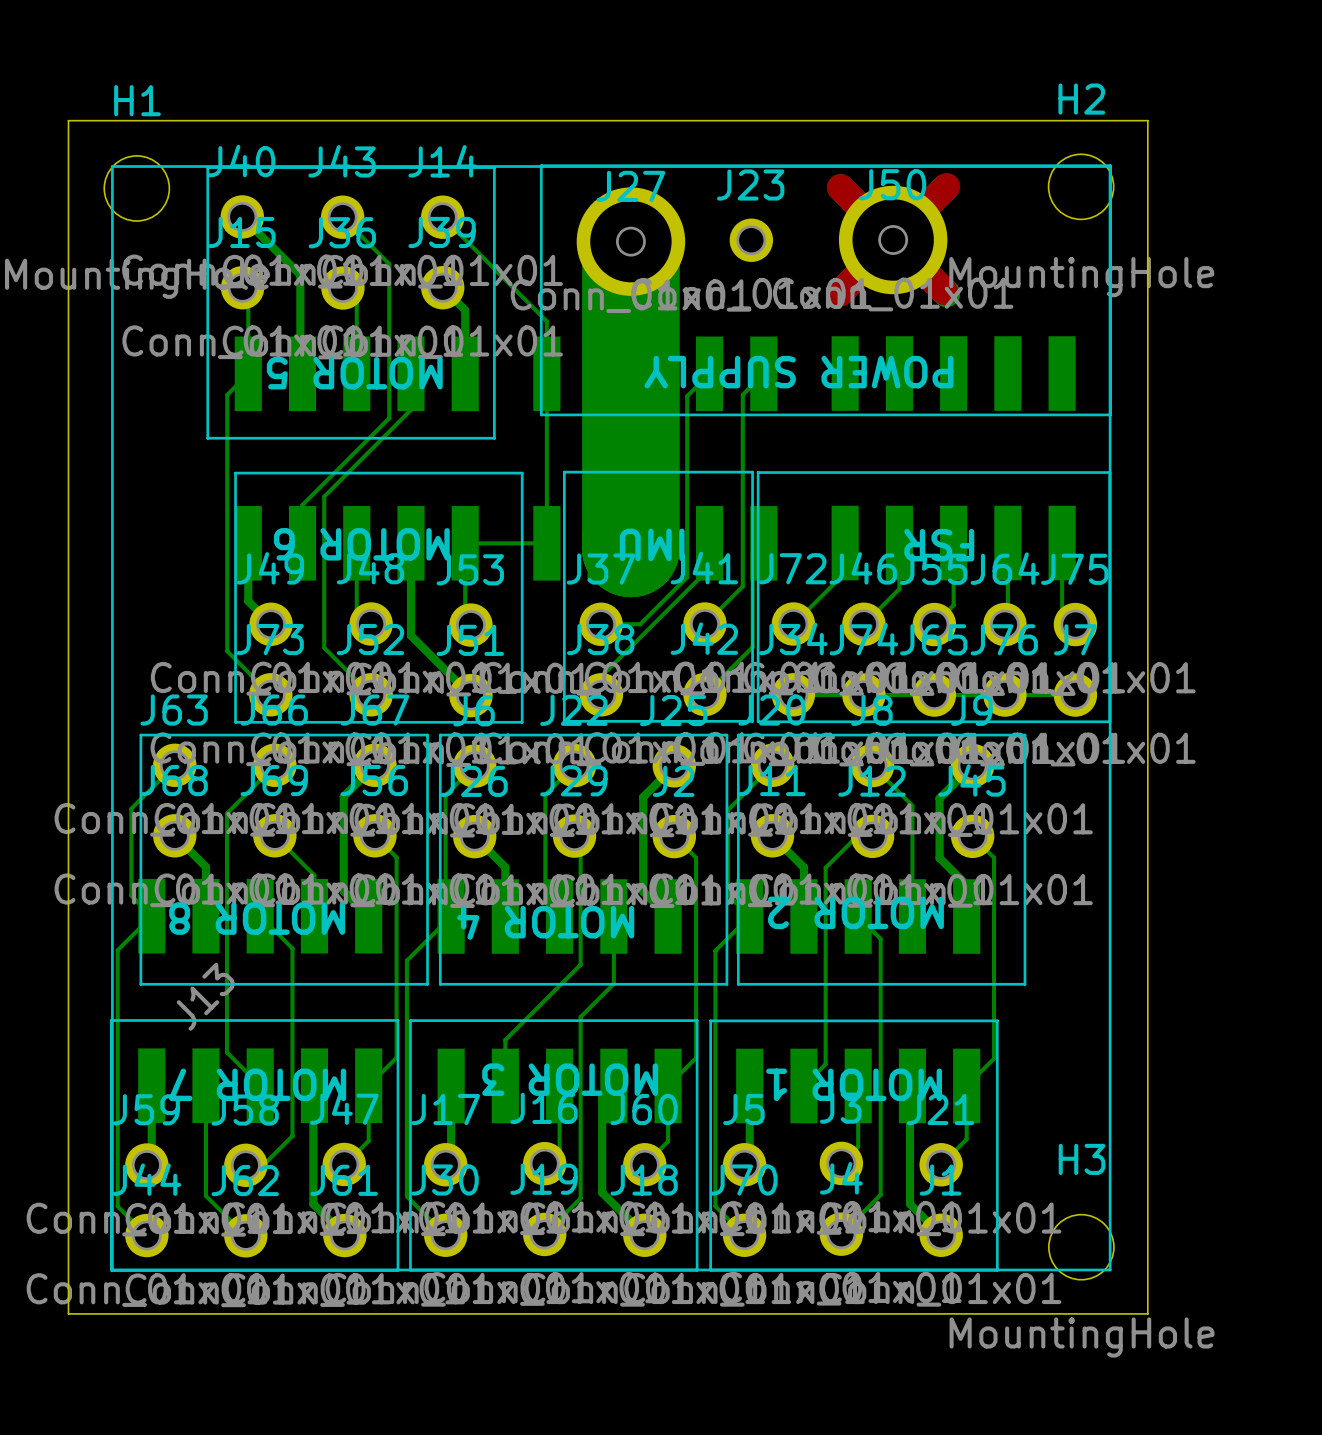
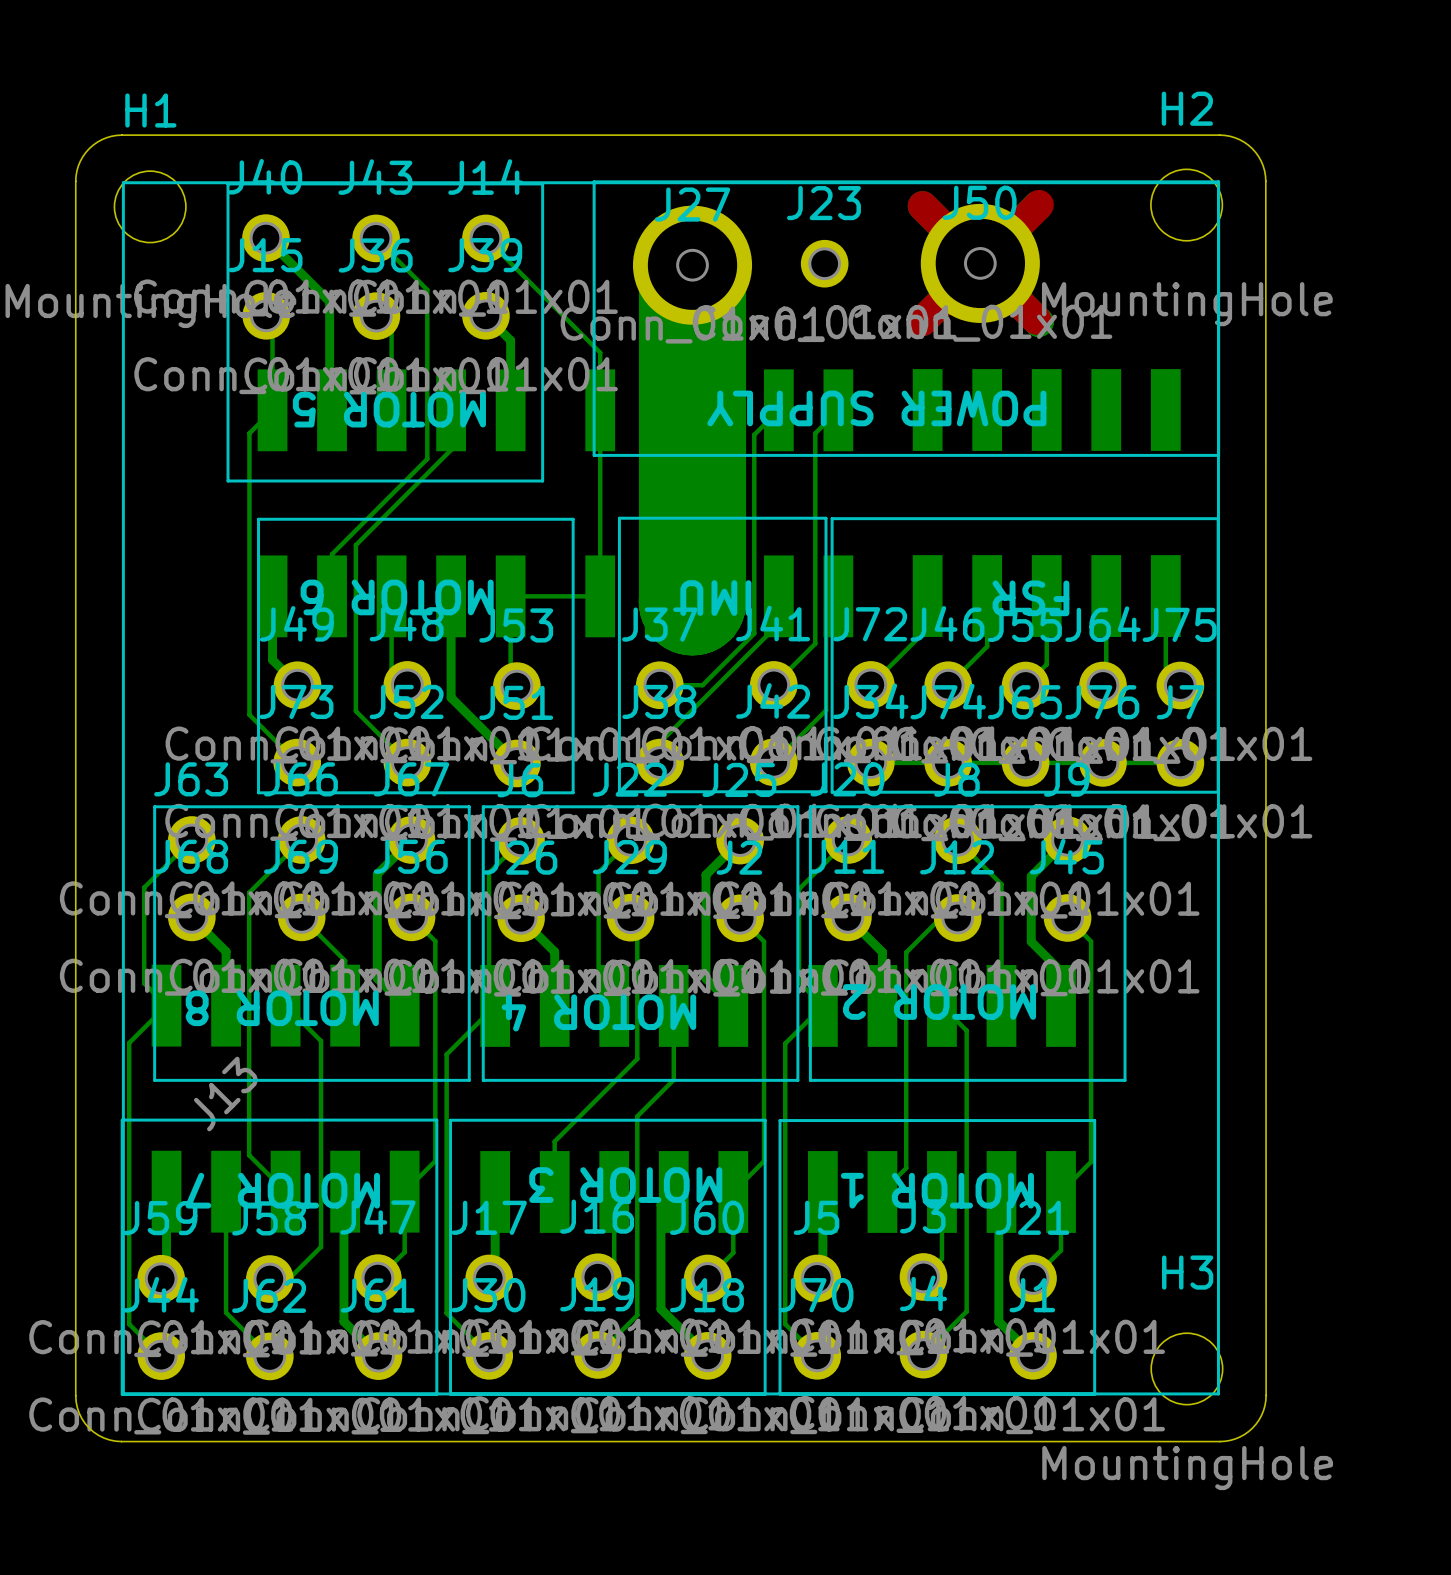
board edge: (68, 120) (1147, 120) (1147, 1313) (68, 1313) (68, 120) -> (121, 135) (106, 137) (89, 148) (78, 166) (75, 181) (75, 1395) (79, 1413) (85, 1423) (98, 1435) (109, 1440) (121, 1441) (1219, 1441) (1235, 1438) (1248, 1431) (1261, 1415) (1266, 1395) (1265, 181) (1263, 166) (1255, 152) (1239, 139) (1219, 135) (121, 135)

